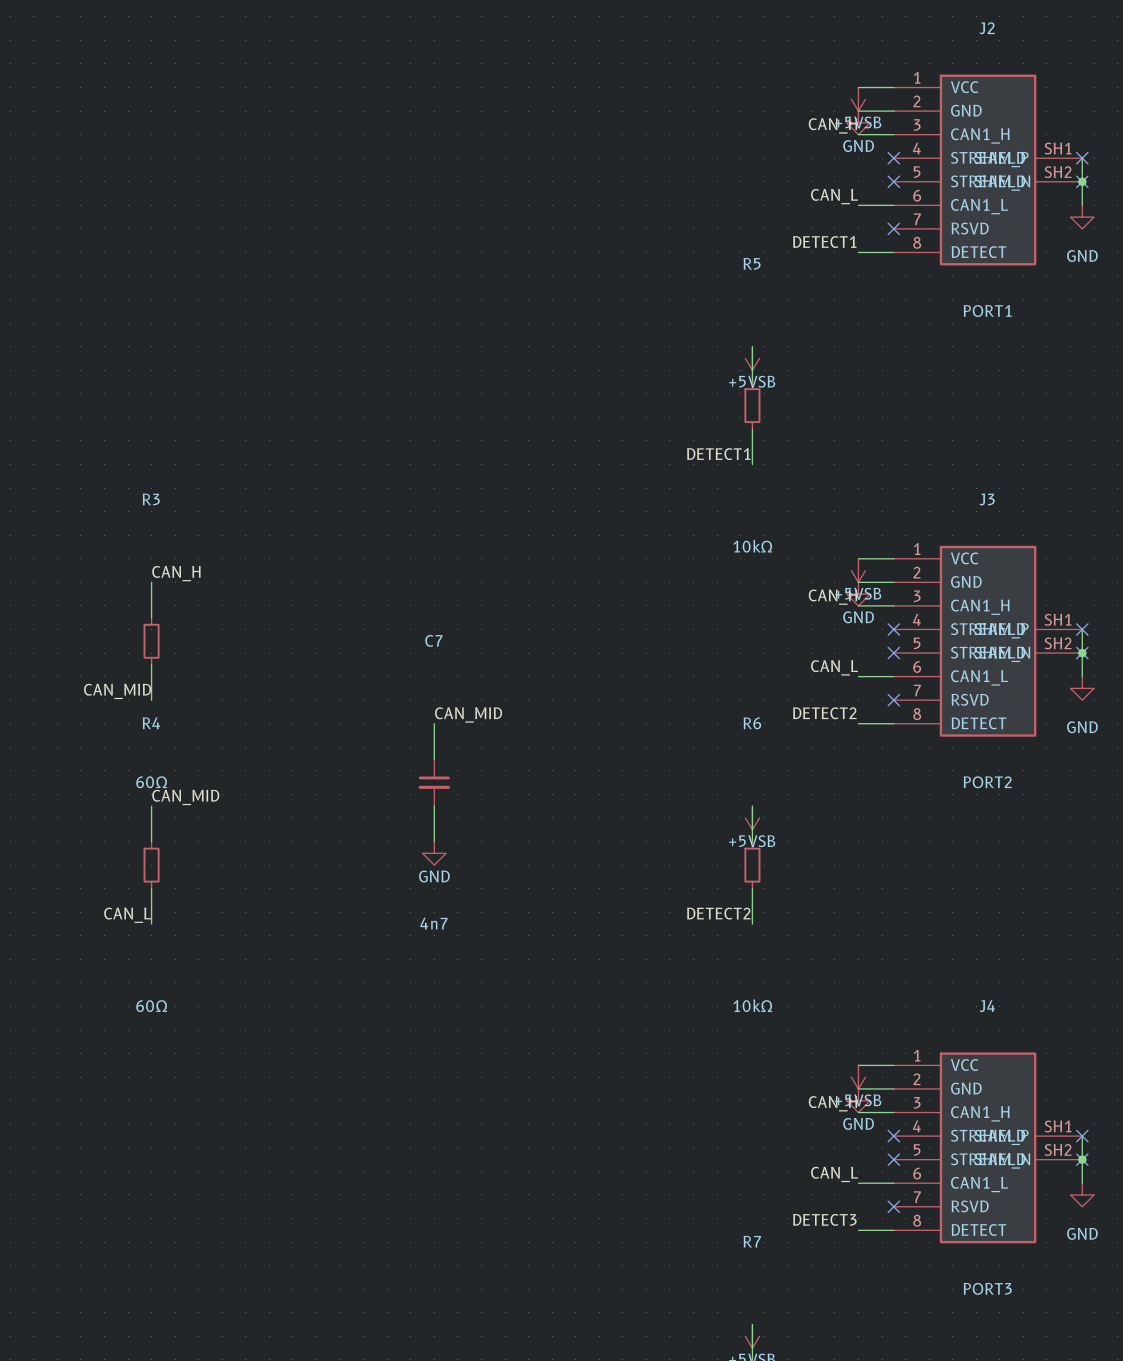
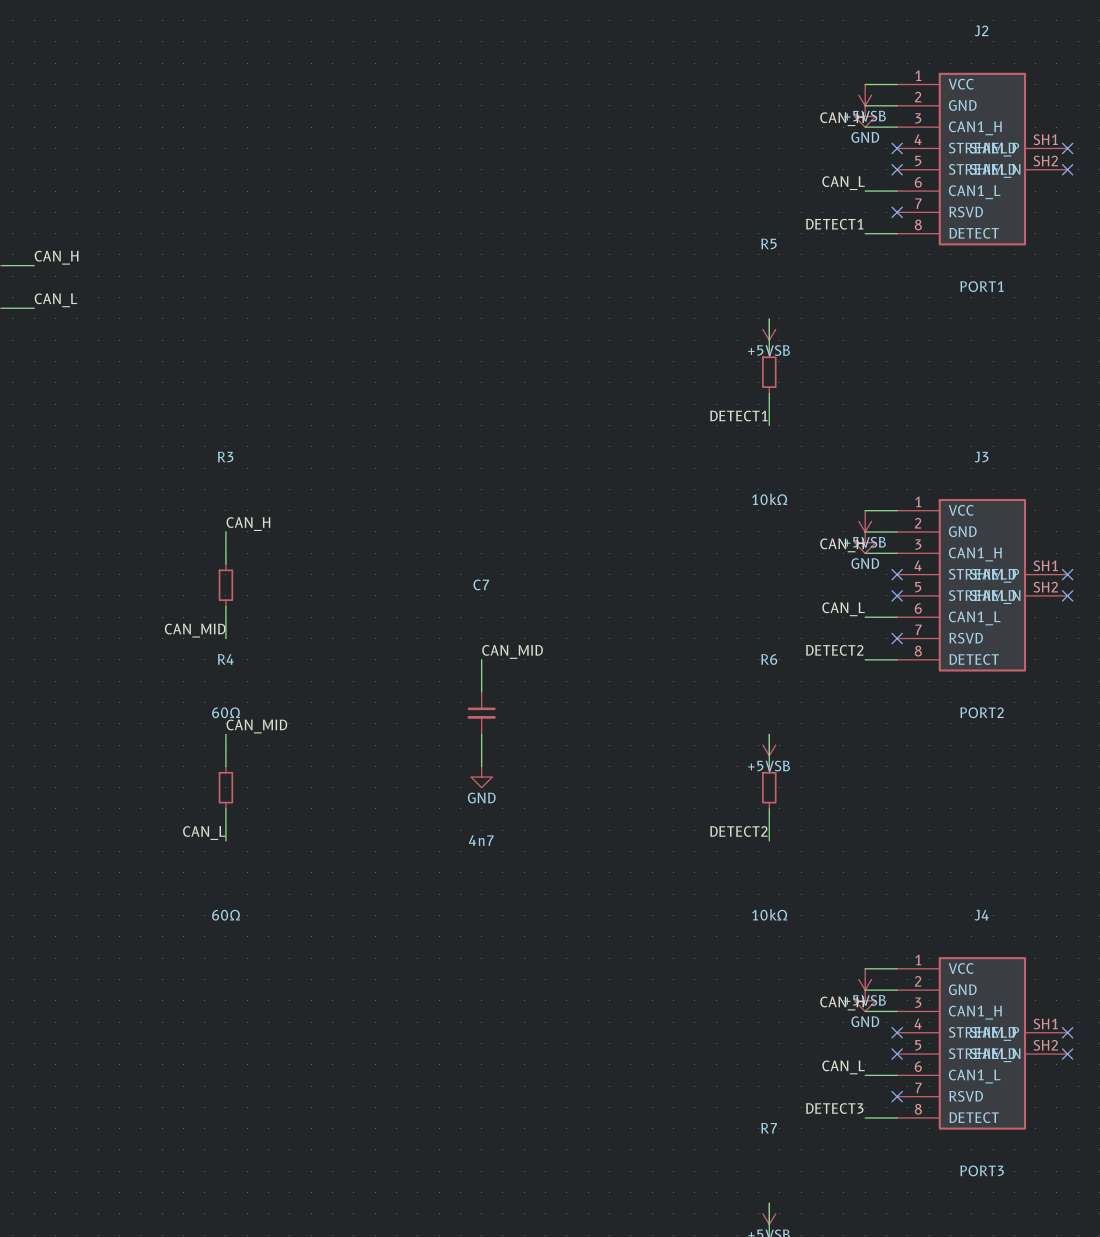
wire: (1082, 158) (1082, 205) -> none
junction: (1082, 181) -> none
power symbol: GND (1082, 217) -> none
wire: (1082, 629) (1082, 676) -> none
junction: (1082, 653) -> none
power symbol: GND (1082, 688) -> none
wire: (1082, 1136) (1082, 1183) -> none
junction: (1082, 1159) -> none
power symbol: GND (1082, 1194) -> none

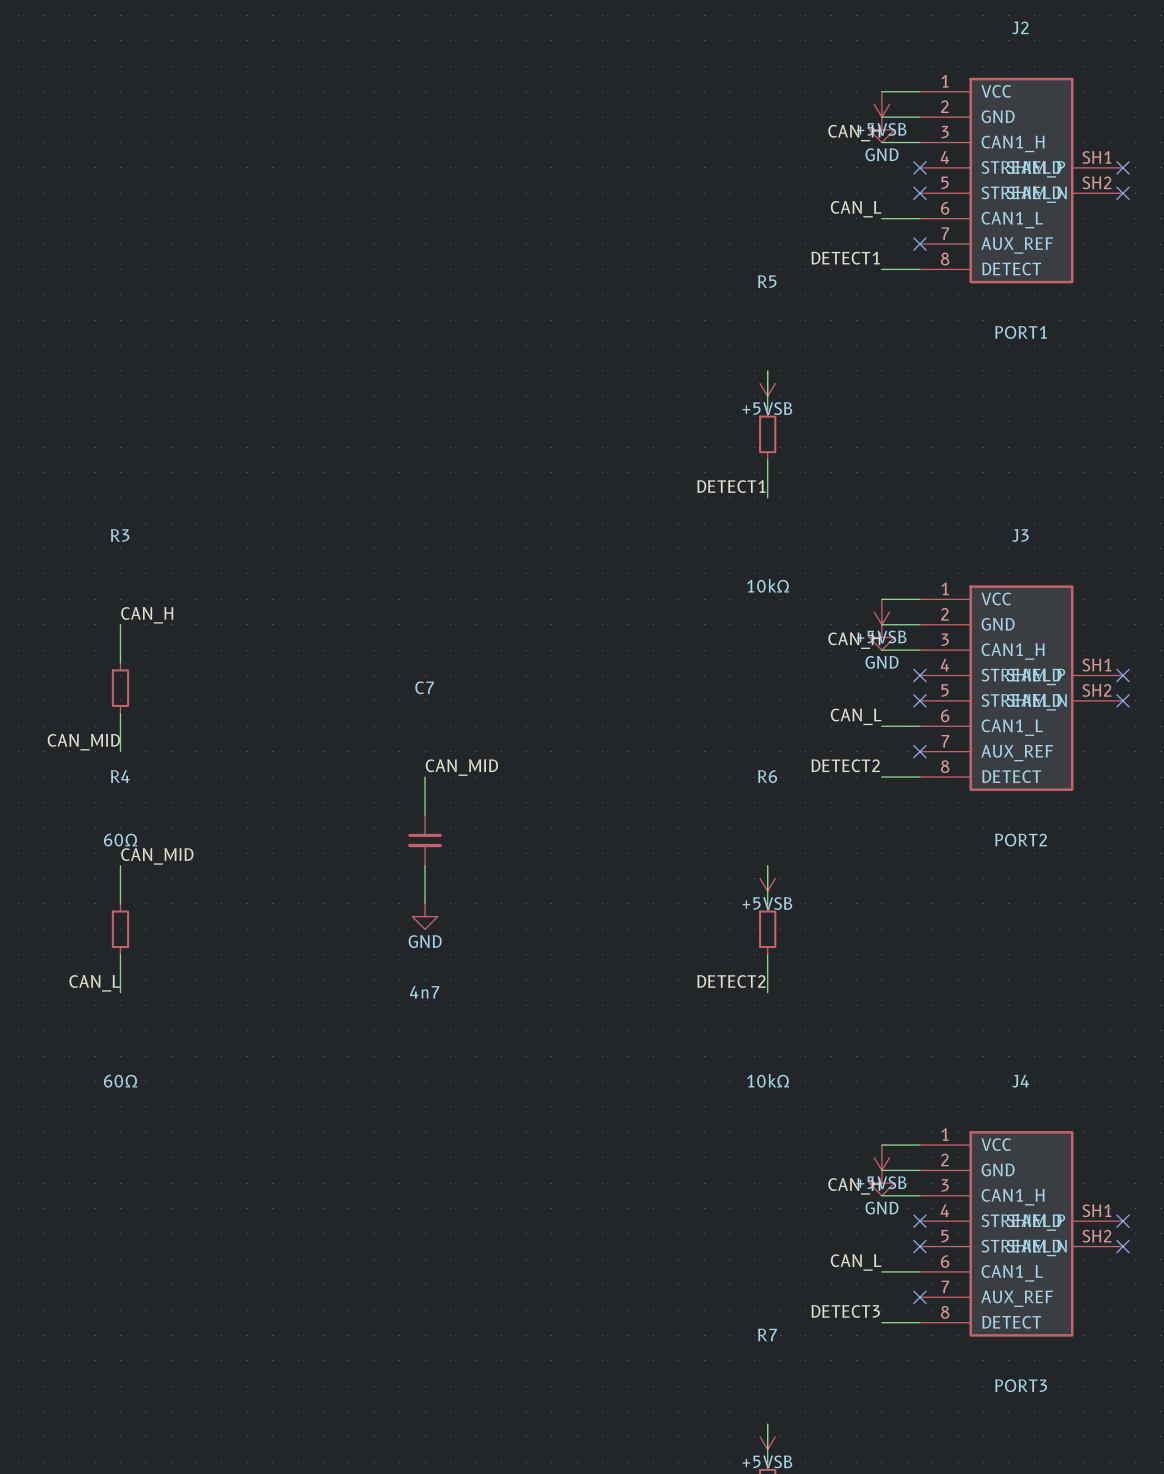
J2 pin name: RSVD (966, 212) -> AUX_REF (1017, 245)
J3 pin name: RSVD (966, 638) -> AUX_REF (1017, 753)
J4 pin name: RSVD (966, 1096) -> AUX_REF (1017, 1298)

